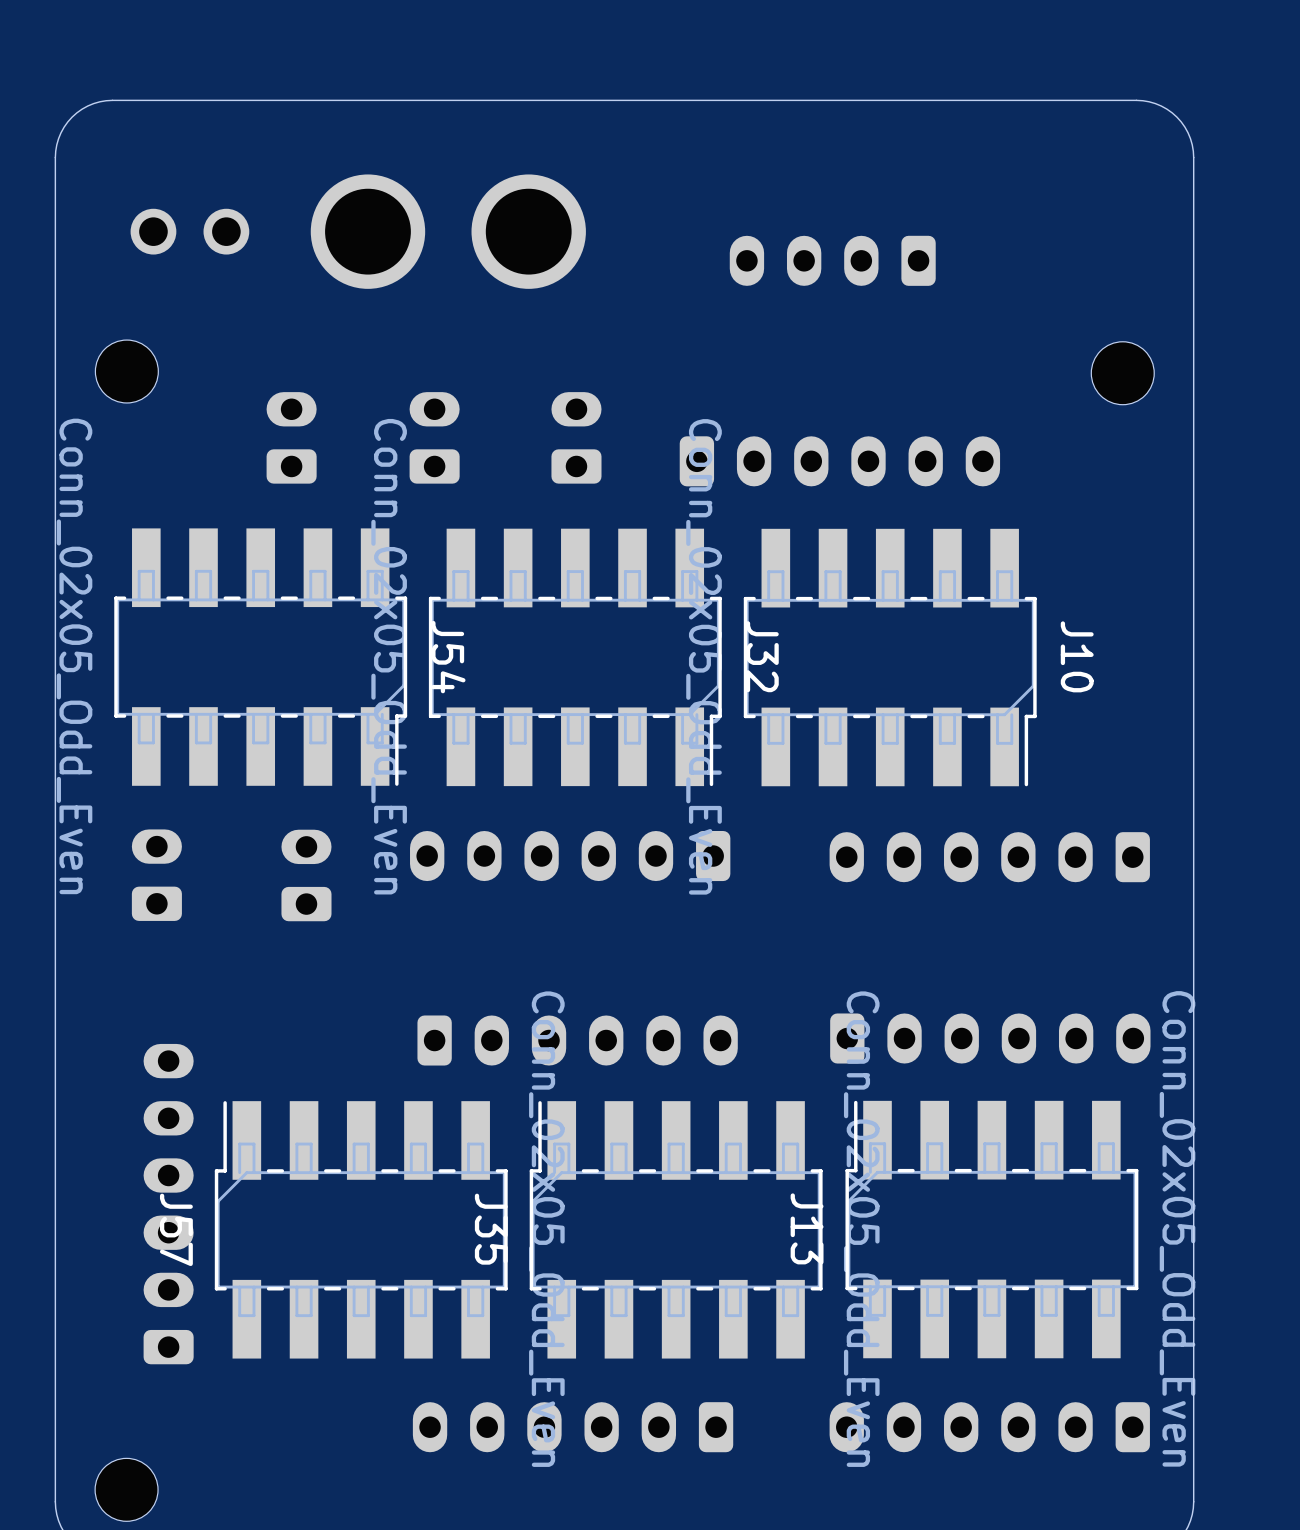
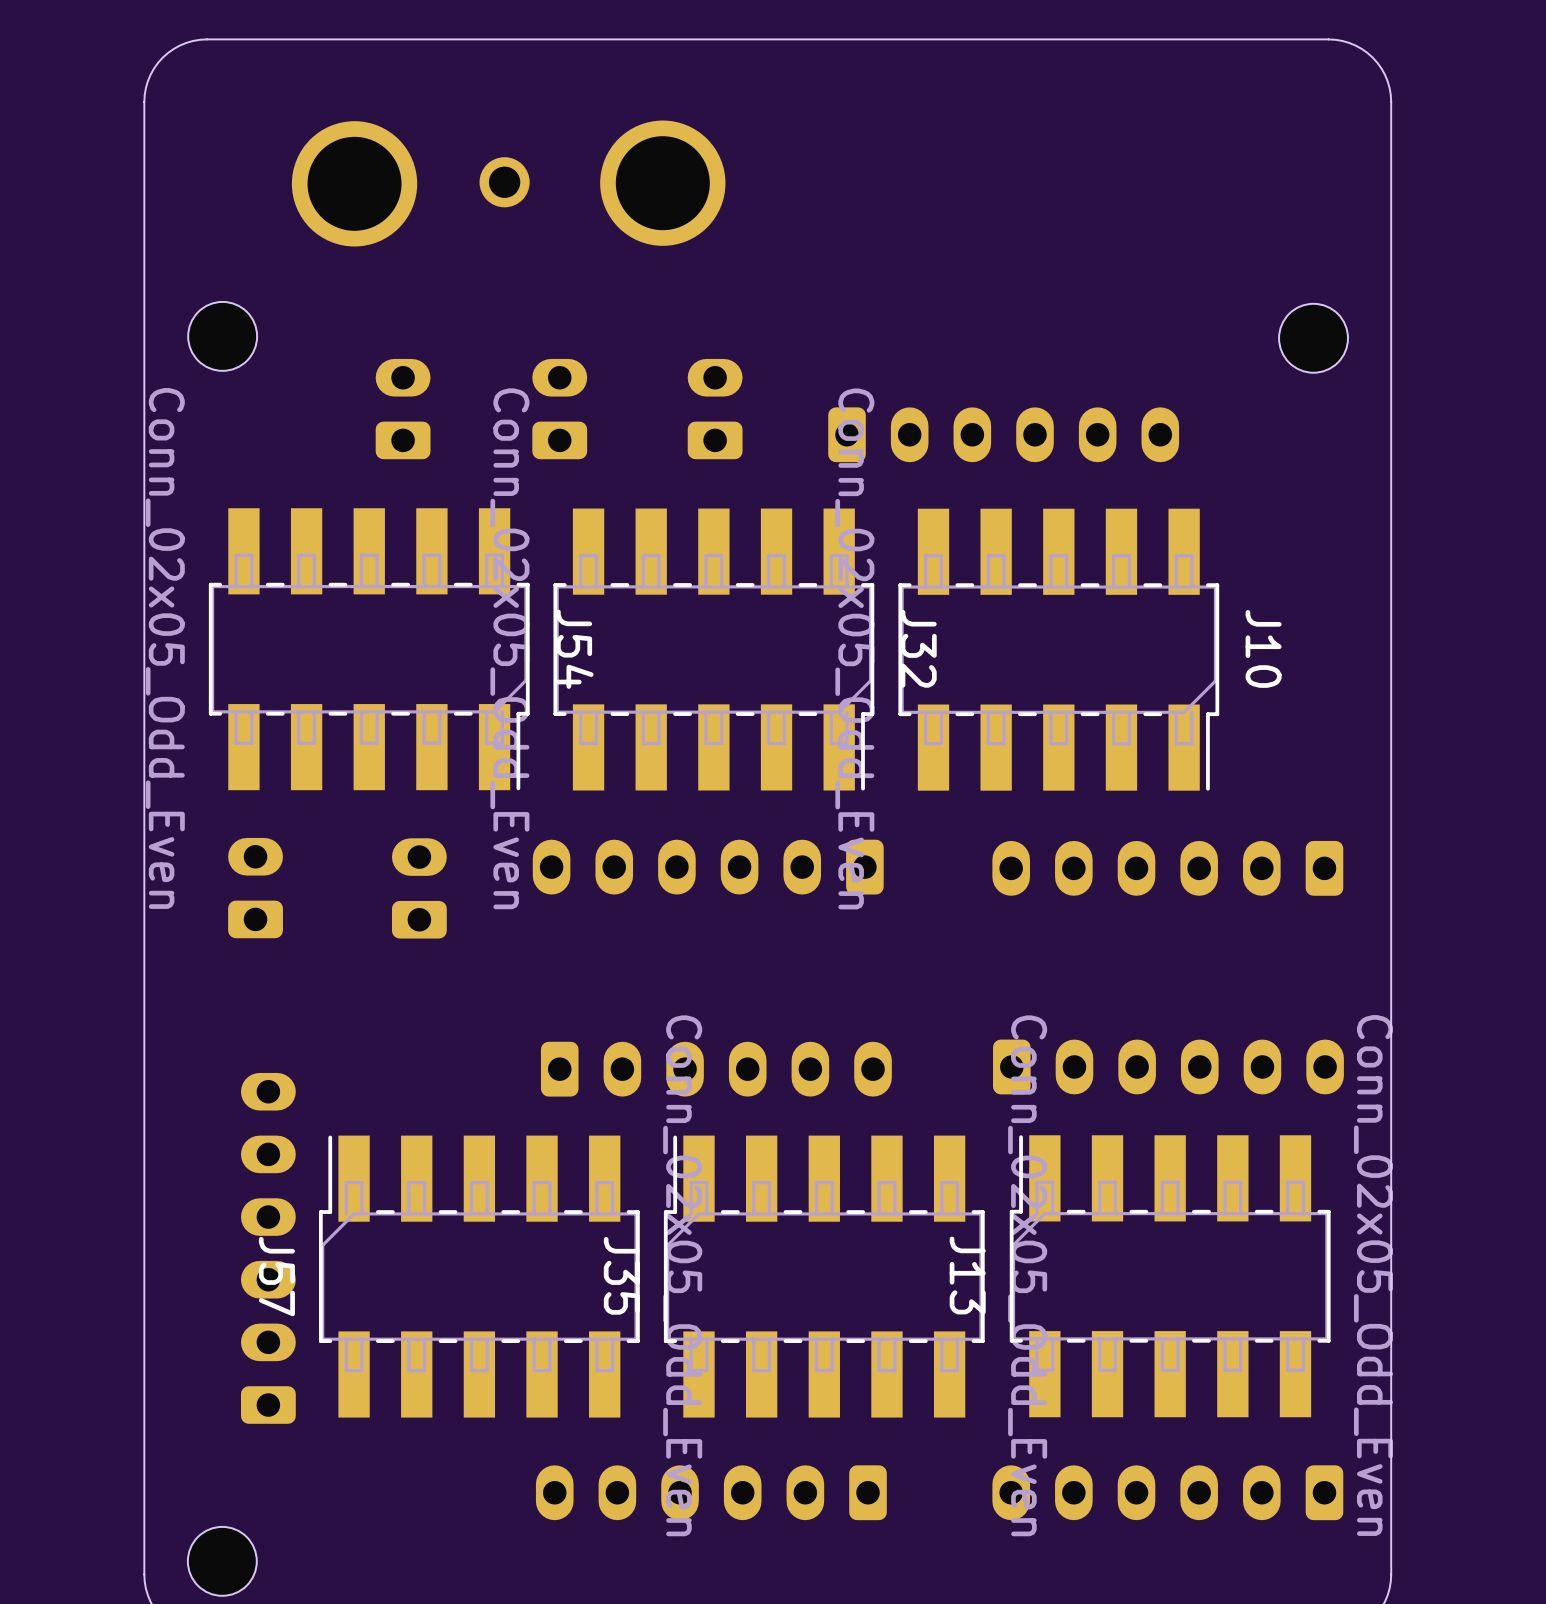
part footprint: [310, 174, 426, 289] -> [479, 157, 530, 208]
part footprint: [203, 208, 250, 255] -> [291, 121, 418, 247]
part: (153, 231) -> none
part: (832, 260) -> none

